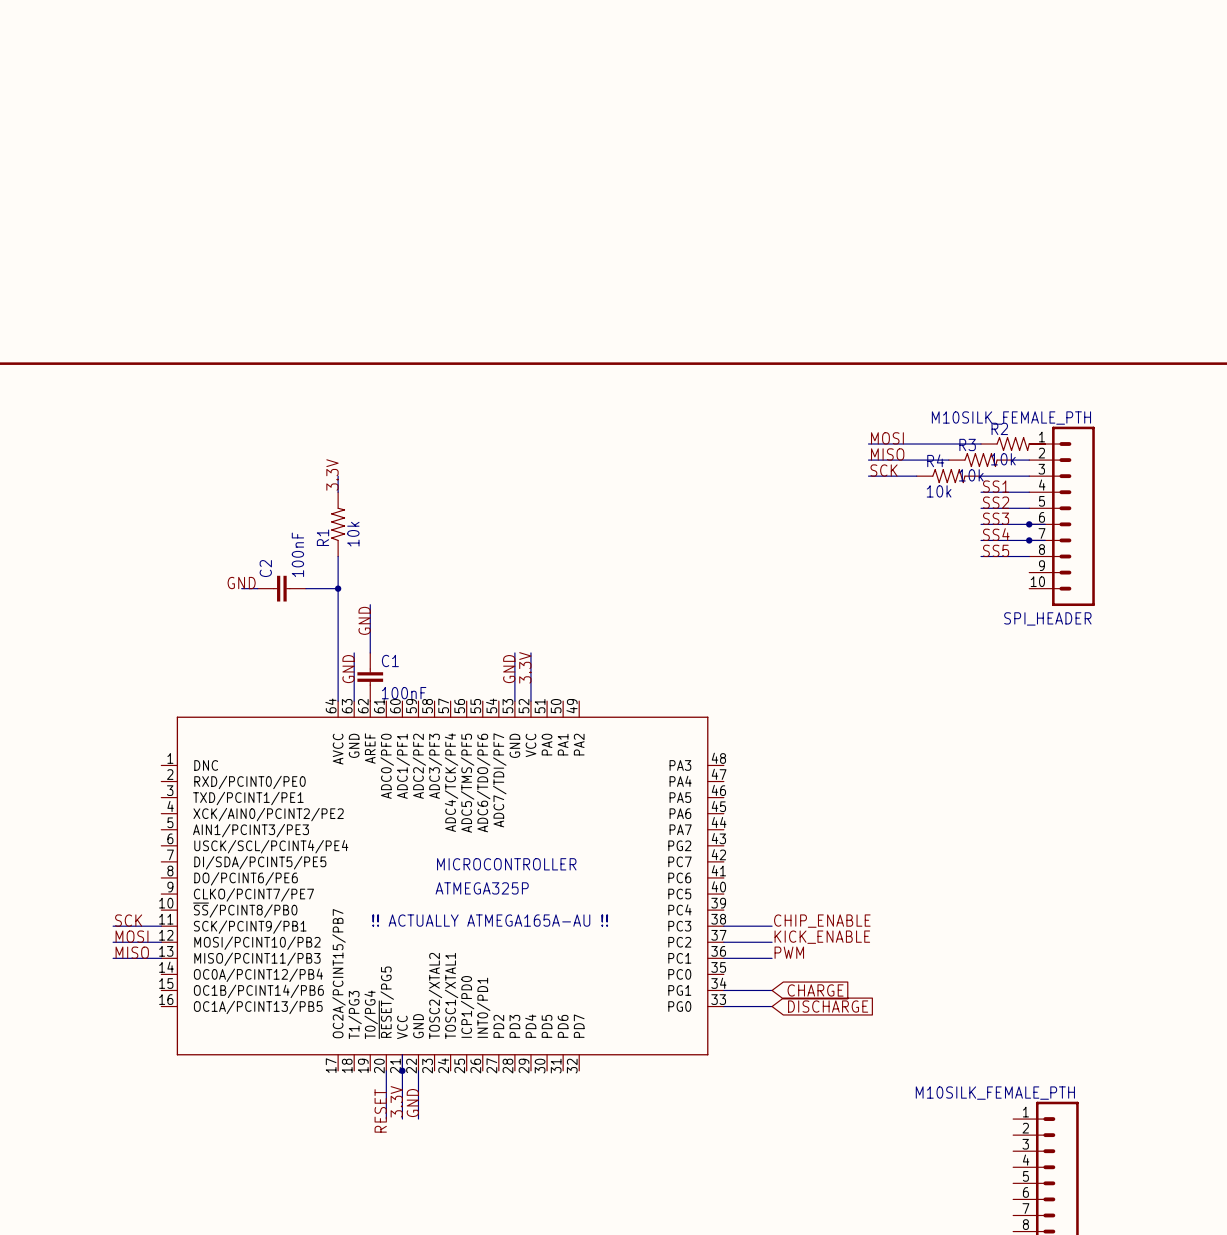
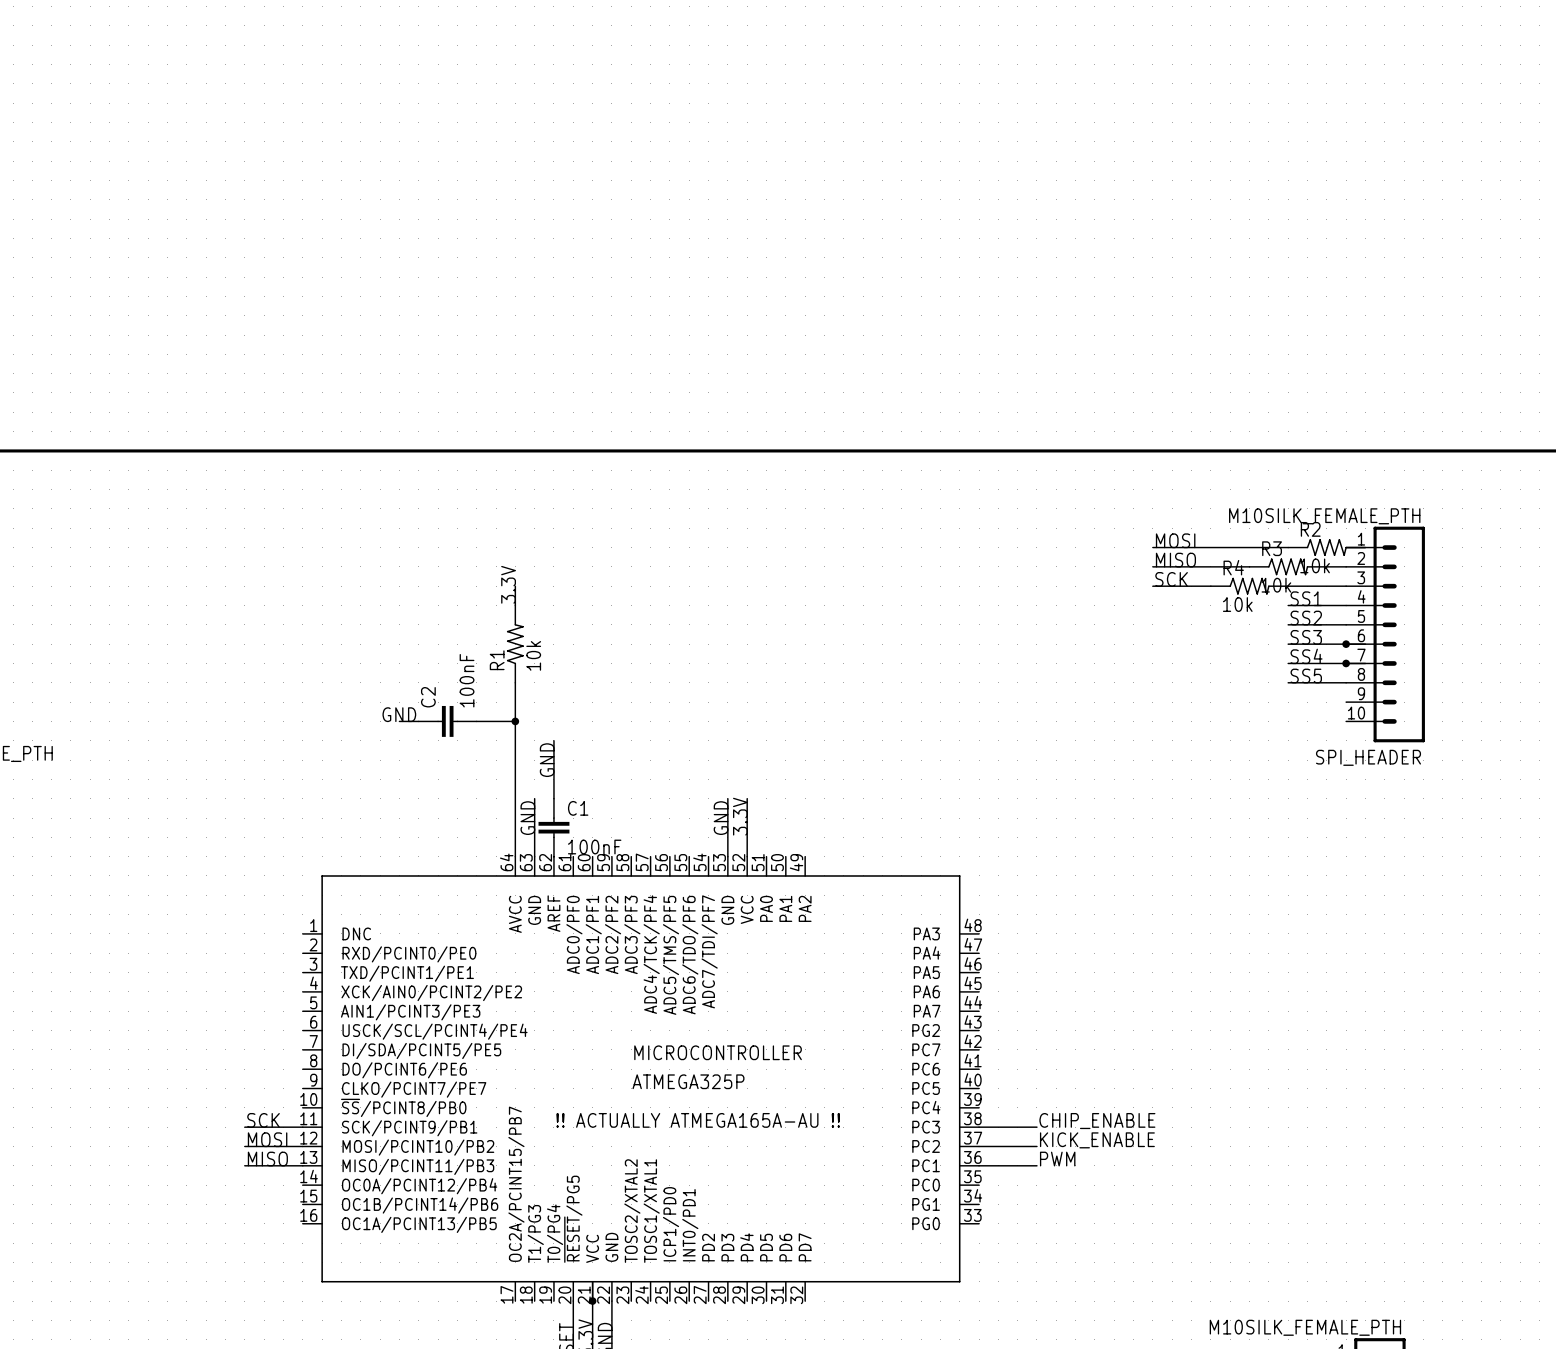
wire: (723, 990) (772, 990) -> none
global label: CHARGE (815, 990) -> none
wire: (723, 1006) (772, 1006) -> none
global label: DISCHARGE (828, 1006) -> none

